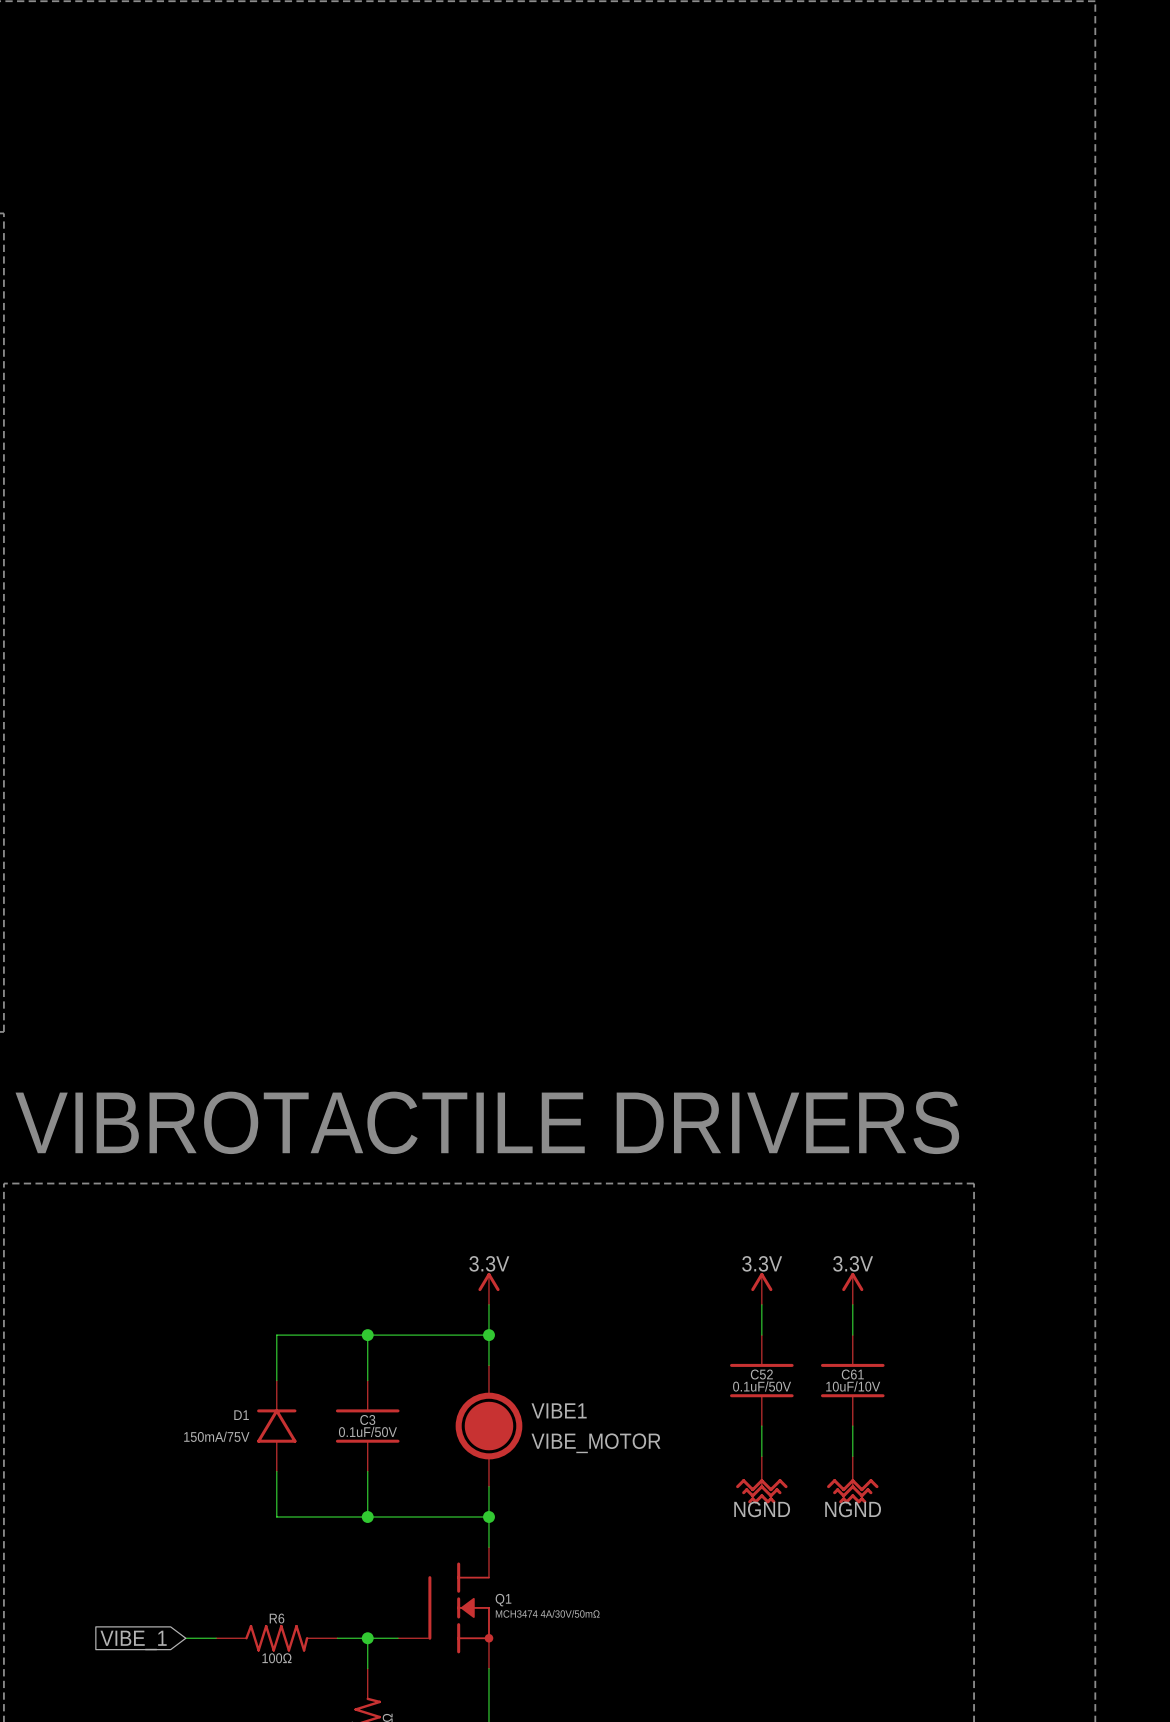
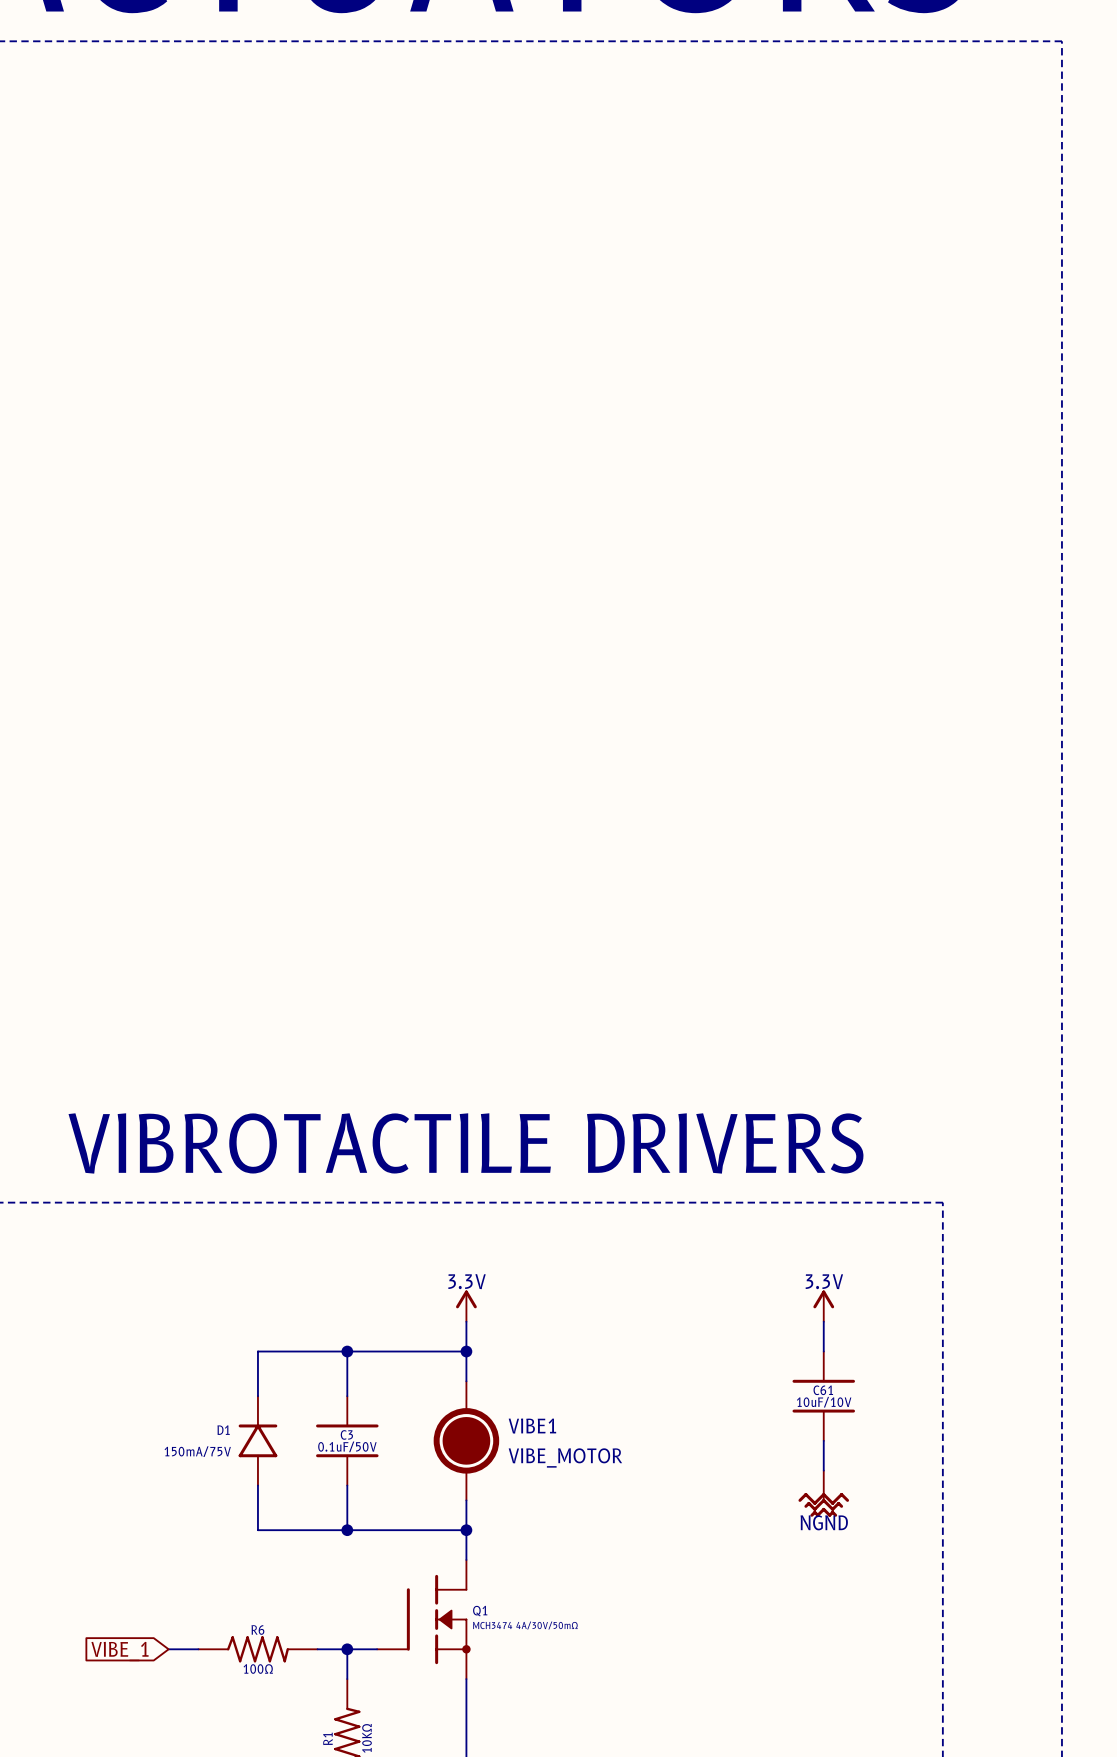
power symbol: (761, 1288) -> none
wire: (761, 1304) (761, 1335) -> none
C52: 0.1uF/50V (761, 1380) -> none
wire: (761, 1426) (761, 1456) -> none
power symbol: (761, 1479) -> none

